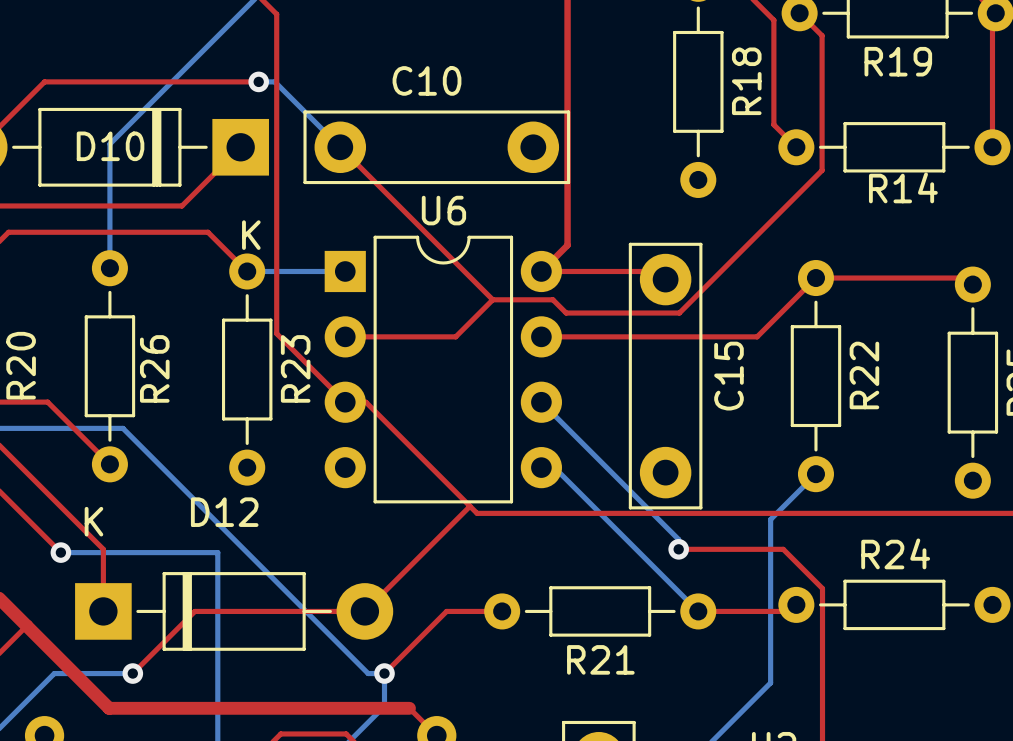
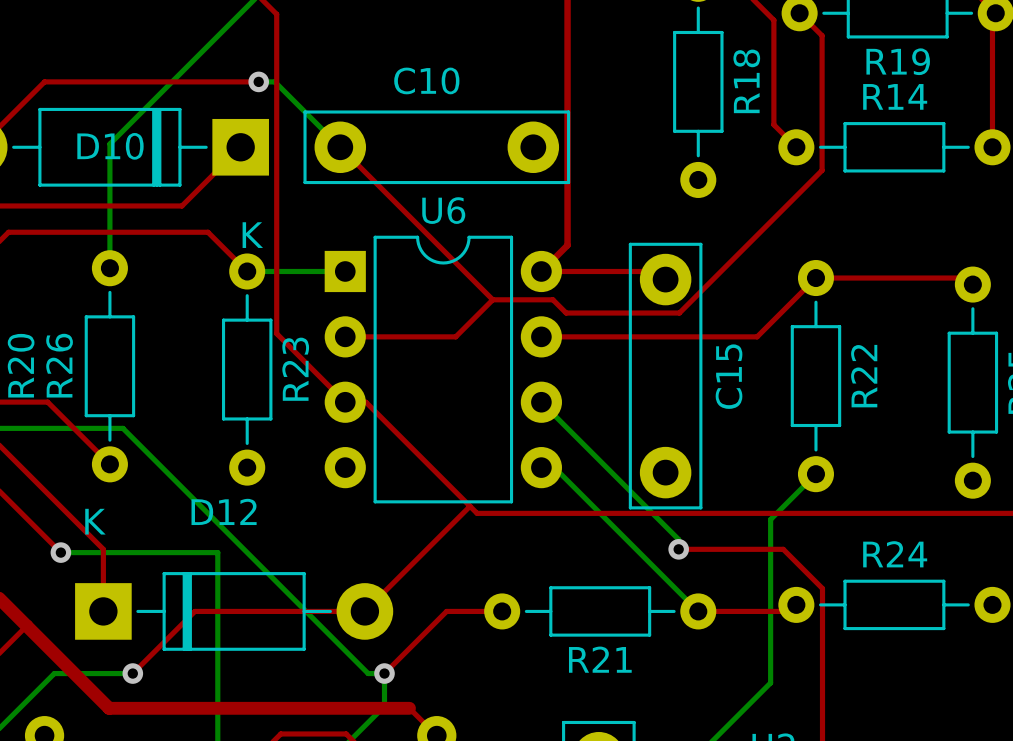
R14 name position: R14 (903, 187) -> R14 (895, 96)
R26 name position: R26 (154, 368) -> R26 (59, 365)

